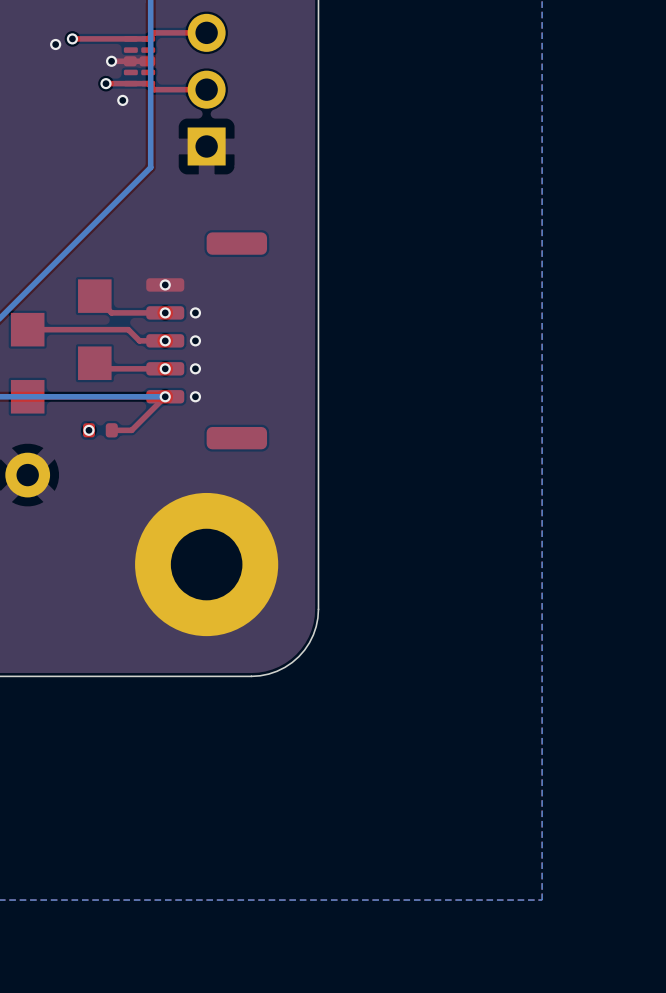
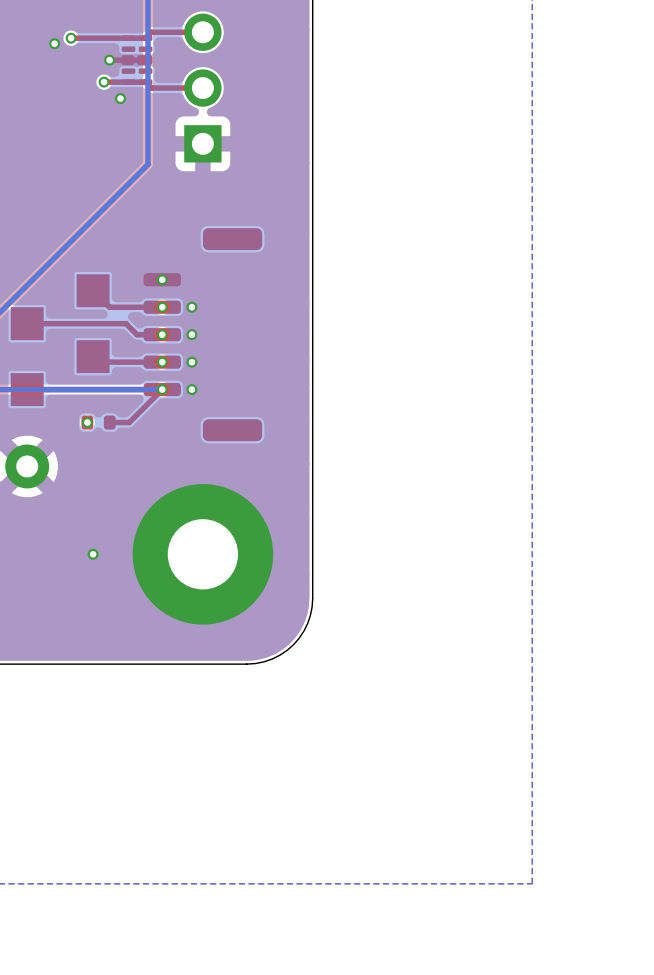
via: none -> (93, 554)

